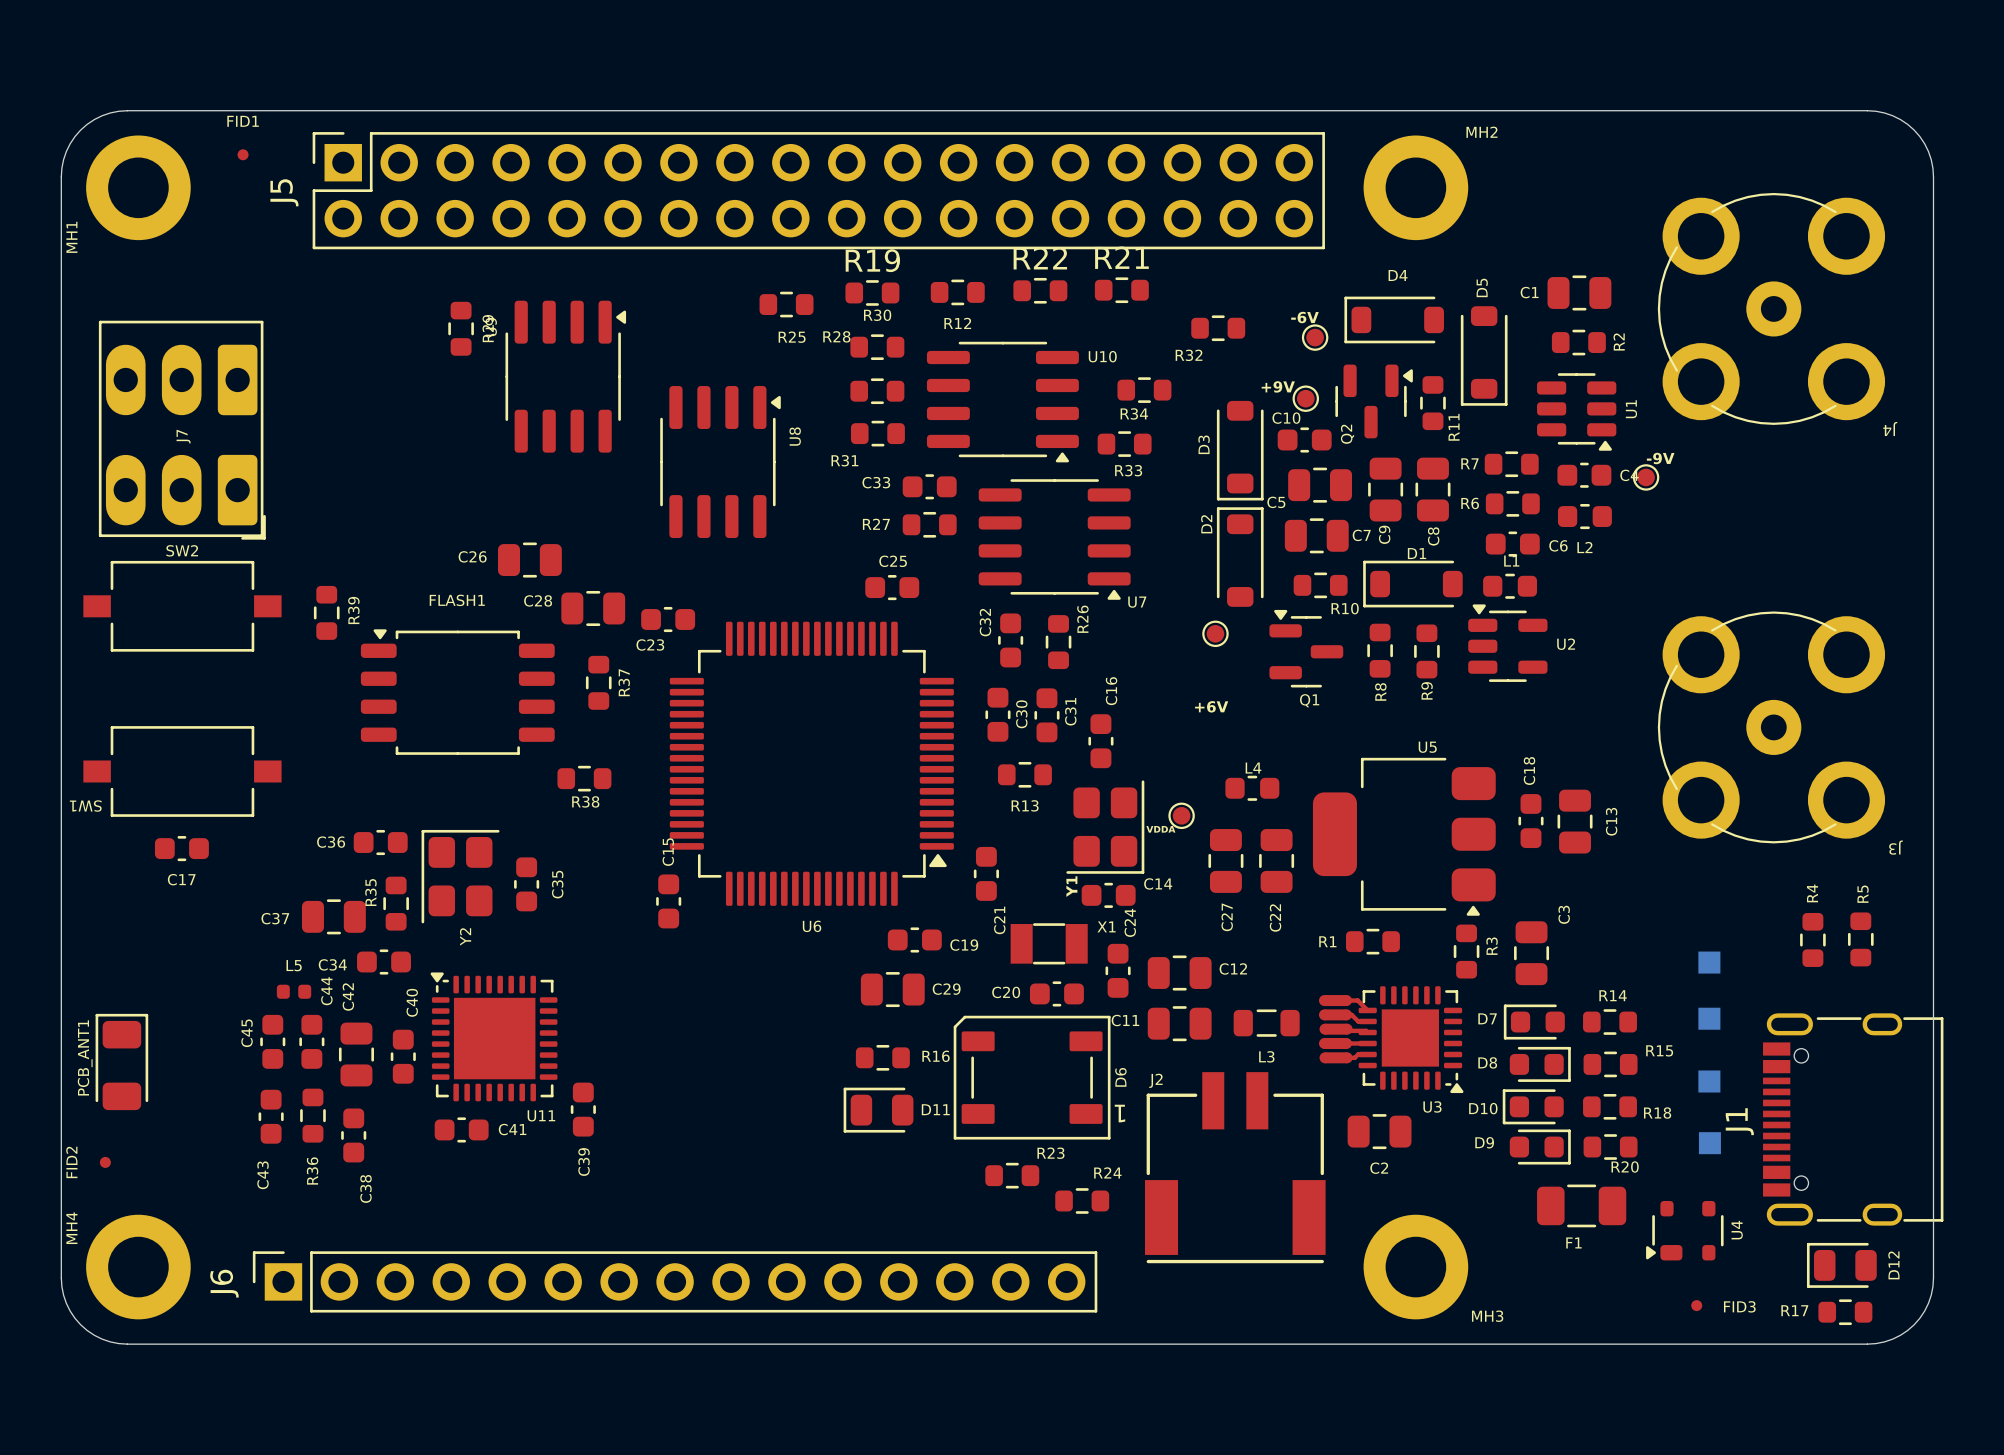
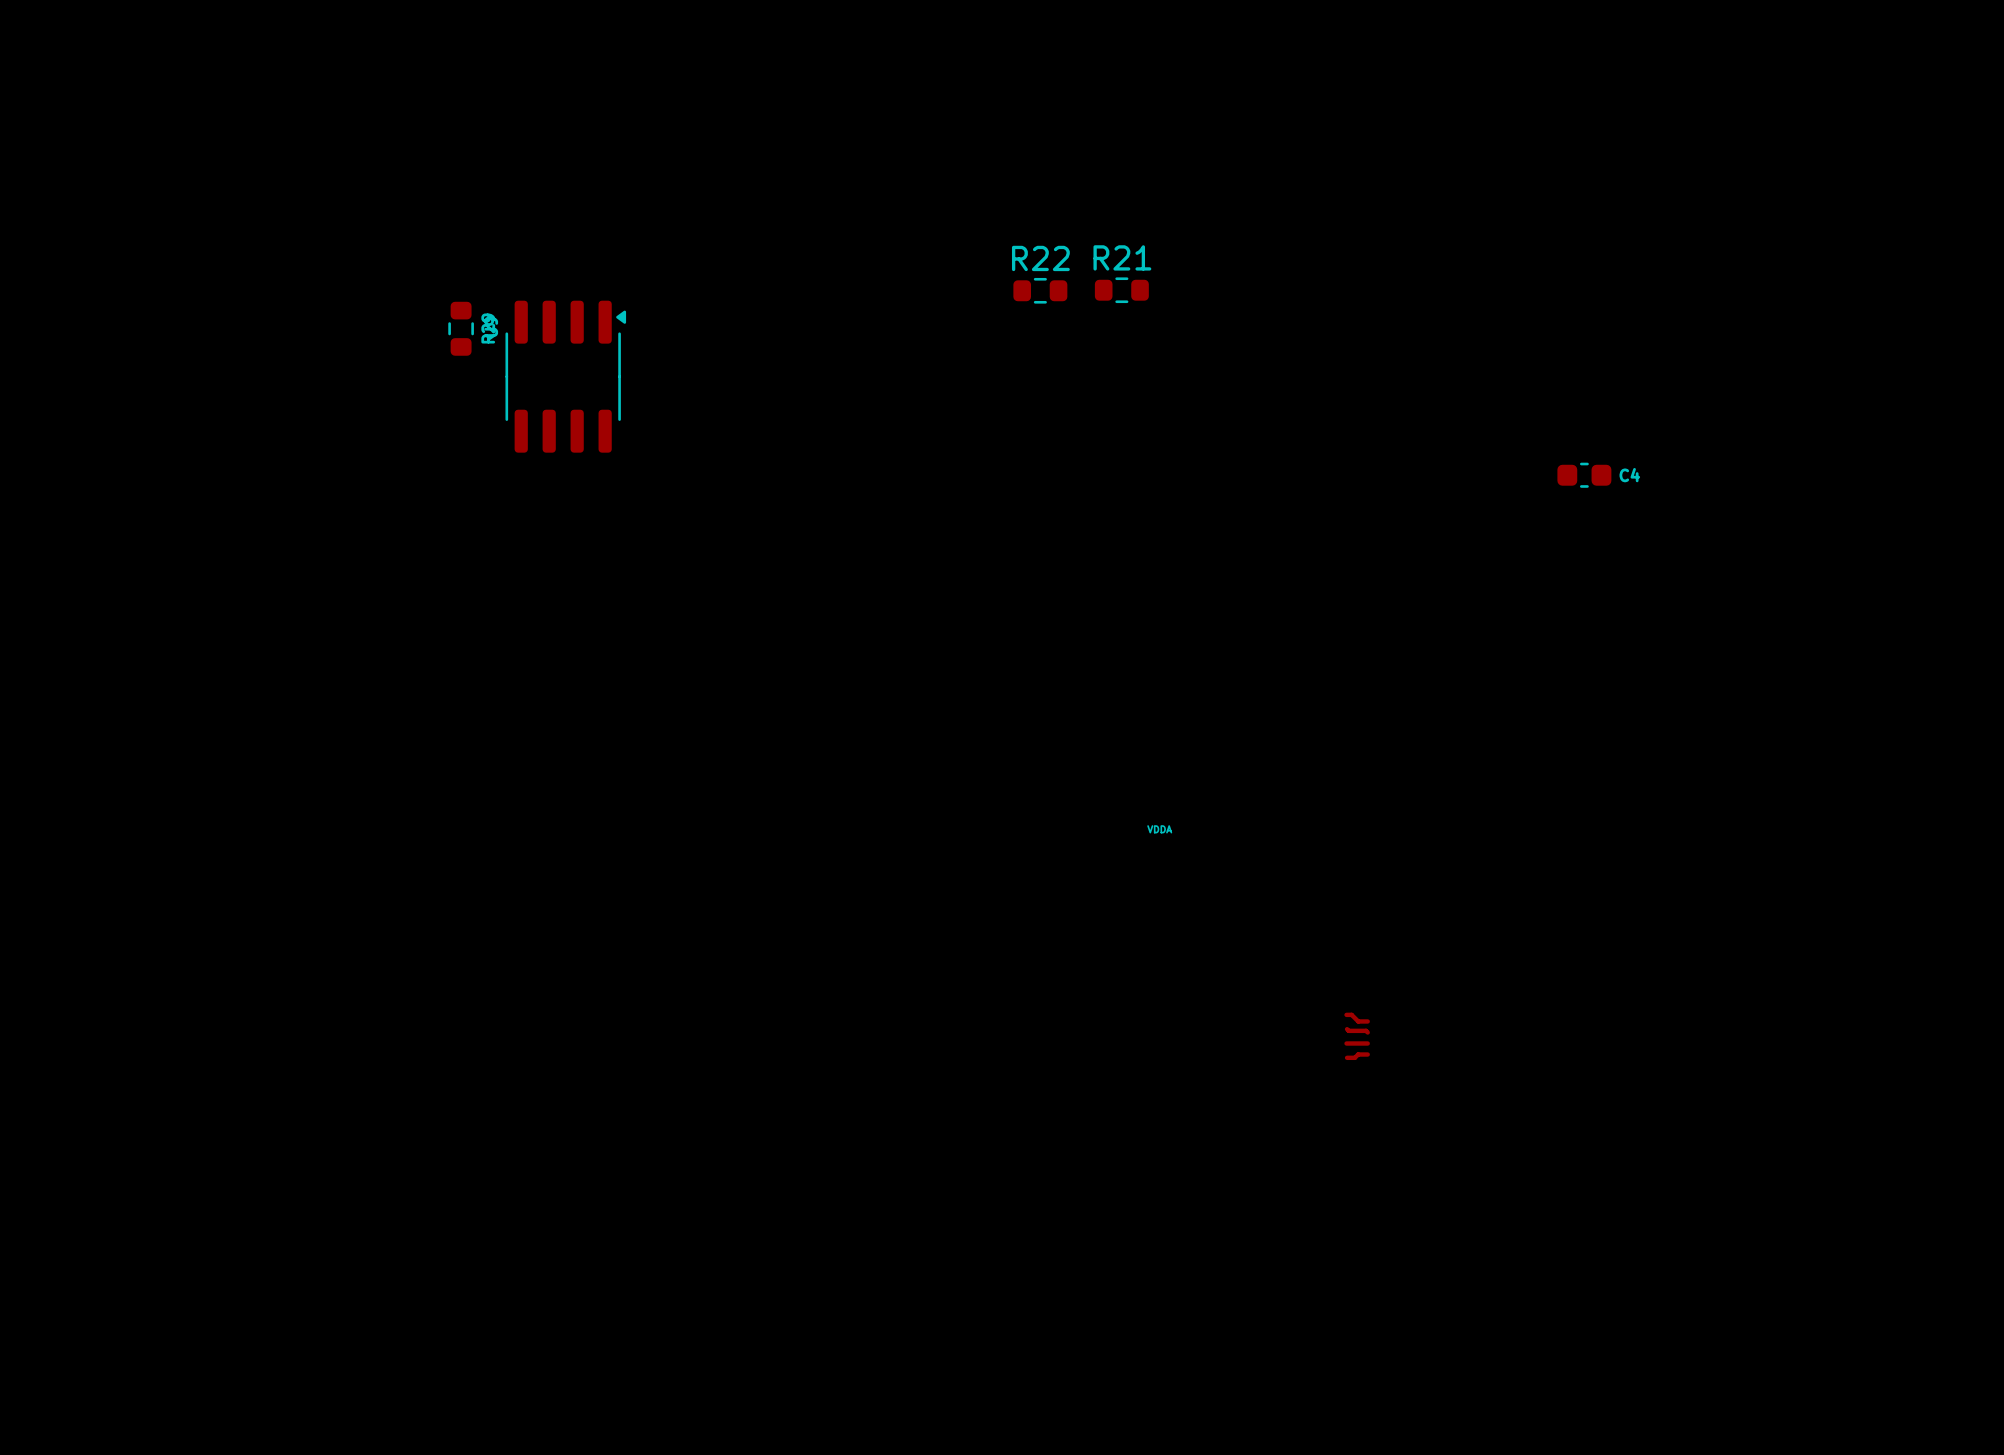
board edge: (127, 110) (1867, 110) (1892, 115) (1907, 124) (1919, 136) (1928, 151) (1933, 176) (1933, 1278) (1931, 1295) (1919, 1318) (1907, 1330) (1892, 1339) (1867, 1344) (127, 1344) (110, 1341) (87, 1330) (74, 1318) (66, 1303) (61, 1278) (61, 176) (66, 151) (80, 130) (102, 115) (127, 110) -> none
FID1: (243, 154) -> none
MH1: (138, 187) -> none
MH2: (1415, 187) -> none
J5: (818, 190) -> none
R19: (872, 292) -> none
R12: (957, 292) -> none
C1: (1579, 292) -> none
R25: (786, 304) -> none
J4: (1771, 308) -> none
text: -6V (1304, 317) -> none
D4: (1394, 319) -> none
R32: (1218, 328) -> none
part: (1315, 337) -> none
R2: (1578, 342) -> none
R30: (877, 347) -> none
D5: (1484, 355) -> none
text: +9V (1278, 386) -> none
R34: (1144, 390) -> none
R28: (877, 391) -> none
part: (1305, 398) -> none
Q2: (1374, 401) -> none
U10: (1002, 402) -> none
R11: (1432, 403) -> none
U1: (1576, 411) -> none
J7: (182, 430) -> none
R31: (877, 433) -> none
C10: (1304, 440) -> none
R33: (1124, 444) -> none
D3: (1240, 450) -> none
text: -9V (1660, 458) -> none
U8: (720, 462) -> none
R7: (1511, 464) -> none
part: (1646, 477) -> none
C5: (1320, 485) -> none
C33: (929, 486) -> none
C9: (1385, 489) -> none
C8: (1432, 489) -> none
R6: (1512, 503) -> none
L2: (1584, 516) -> none
R27: (929, 524) -> none
C7: (1316, 535) -> none
U7: (1054, 539) -> none
C6: (1512, 544) -> none
D2: (1240, 557) -> none
C26: (529, 560) -> none
D1: (1412, 584) -> none
R10: (1320, 585) -> none
L1: (1510, 586) -> none
C25: (892, 587) -> none
SW2: (182, 606) -> none
C28: (593, 608) -> none
R39: (326, 612) -> none
C23: (668, 619) -> none
part: (1215, 633) -> none
C32: (1010, 640) -> none
R26: (1058, 642) -> none
U2: (1507, 643) -> none
Q1: (1306, 648) -> none
R8: (1380, 650) -> none
R9: (1426, 651) -> none
R37: (598, 682) -> none
FLASH1: (457, 692) -> none
text: +6V (1211, 706) -> none
C30: (997, 714) -> none
C31: (1046, 715) -> none
J3: (1771, 727) -> none
C16: (1100, 741) -> none
U6: (811, 763) -> none
SW1: (182, 771) -> none
R13: (1024, 774) -> none
R38: (584, 778) -> none
L4: (1252, 788) -> none
part: (1181, 815) -> none
C18: (1530, 821) -> none
C13: (1575, 821) -> none
Y1: (1105, 827) -> none
U5: (1404, 836) -> none
C36: (380, 842) -> none
C17: (181, 848) -> none
C27: (1225, 860) -> none
C22: (1276, 860) -> none
C21: (986, 873) -> none
Y2: (460, 876) -> none
C35: (526, 884) -> none
C14: (1108, 895) -> none
C15: (668, 901) -> none
R35: (396, 903) -> none
C37: (333, 916) -> none
C19: (914, 939) -> none
R4: (1812, 939) -> none
R5: (1860, 939) -> none
R1: (1372, 941) -> none
X1: (1049, 943) -> none
R3: (1466, 951) -> none
C3: (1531, 953) -> none
C34: (384, 962) -> none
part: (1709, 962) -> none
C24: (1118, 970) -> none
C12: (1179, 973) -> none
C29: (892, 989) -> none
L5: (294, 991) -> none
C20: (1056, 993) -> none
part: (1335, 1000) -> none
top track: (1346, 1000) (1357, 1000) (1367, 1010) -> none
part: (1335, 1014) -> none
part: (1709, 1018) -> none
D7: (1534, 1022) -> none
R14: (1610, 1022) -> none
C11: (1179, 1023) -> none
L3: (1266, 1023) -> none
part: (1336, 1029) -> none
U11: (494, 1036) -> none
U3: (1411, 1039) -> none
C45: (272, 1041) -> none
C44: (311, 1041) -> none
part: (1335, 1043) -> none
C42: (356, 1054) -> none
C40: (403, 1056) -> none
R16: (882, 1057) -> none
part: (1336, 1057) -> none
PCB_ANT1: (121, 1062) -> none
D8: (1540, 1064) -> none
R15: (1610, 1064) -> none
D6: (1032, 1077) -> none
part: (1709, 1081) -> none
D9: (1533, 1106) -> none
R18: (1610, 1106) -> none
C39: (583, 1109) -> none
D11: (878, 1110) -> none
R36: (312, 1115) -> none
C43: (271, 1116) -> none
J1: (1853, 1119) -> none
C41: (461, 1129) -> none
C2: (1379, 1131) -> none
C38: (353, 1135) -> none
part: (1709, 1143) -> none
D10: (1540, 1147) -> none
R20: (1610, 1147) -> none
FID2: (105, 1162) -> none
J2: (1235, 1167) -> none
R23: (1012, 1175) -> none
R24: (1082, 1200) -> none
F1: (1581, 1205) -> none
U4: (1684, 1230) -> none
D12: (1841, 1265) -> none
MH4: (138, 1267) -> none
MH3: (1415, 1267) -> none
J6: (675, 1281) -> none
FID3: (1696, 1305) -> none
R17: (1845, 1312) -> none

